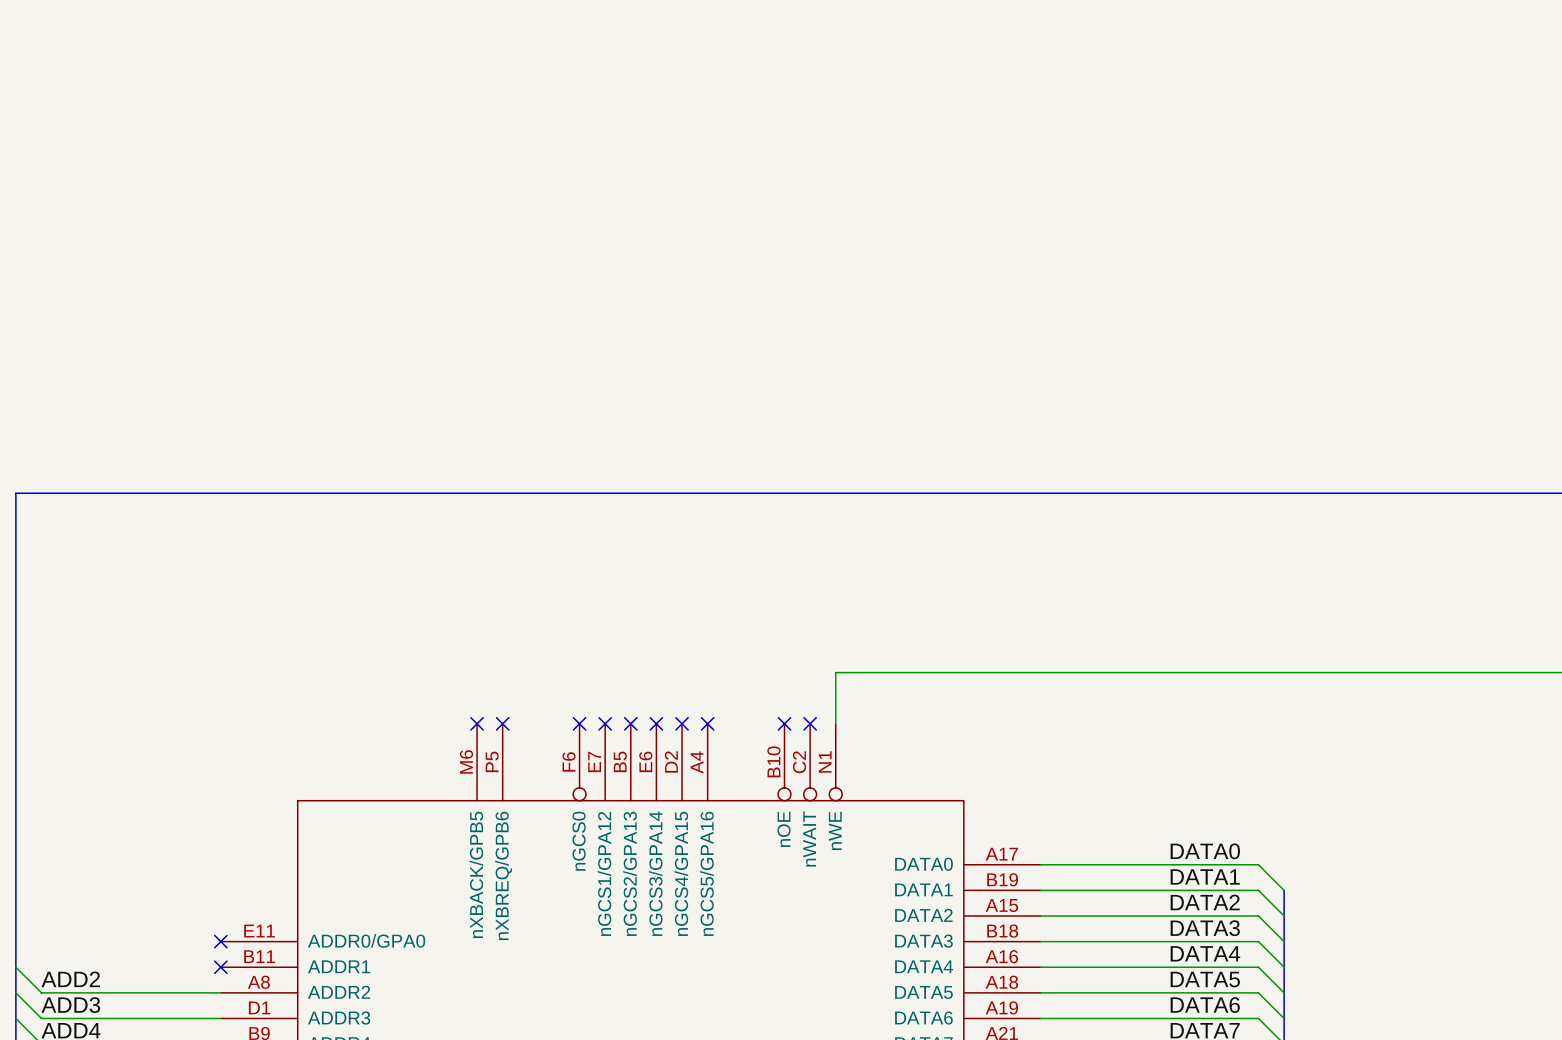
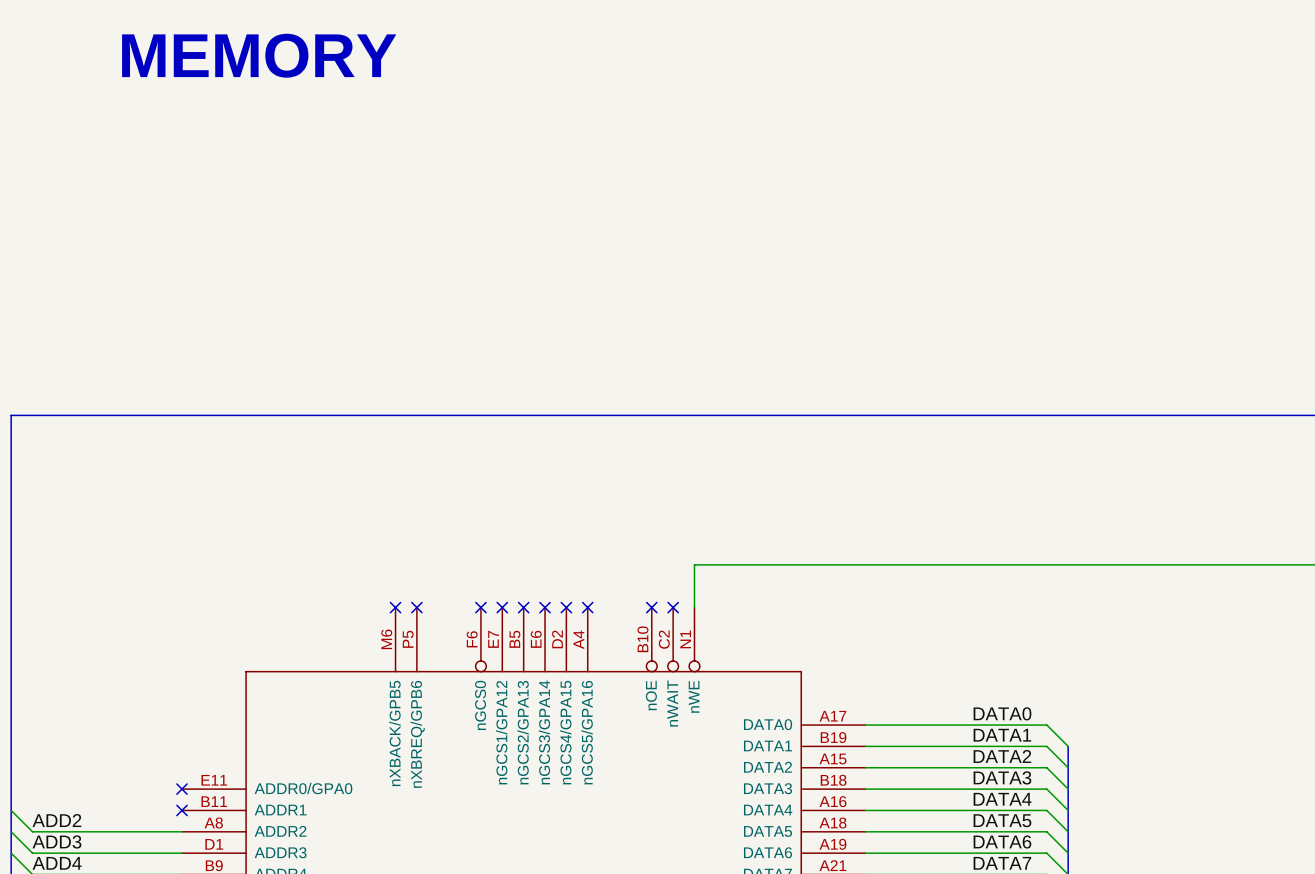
text: none -> MEMORY (259, 55)

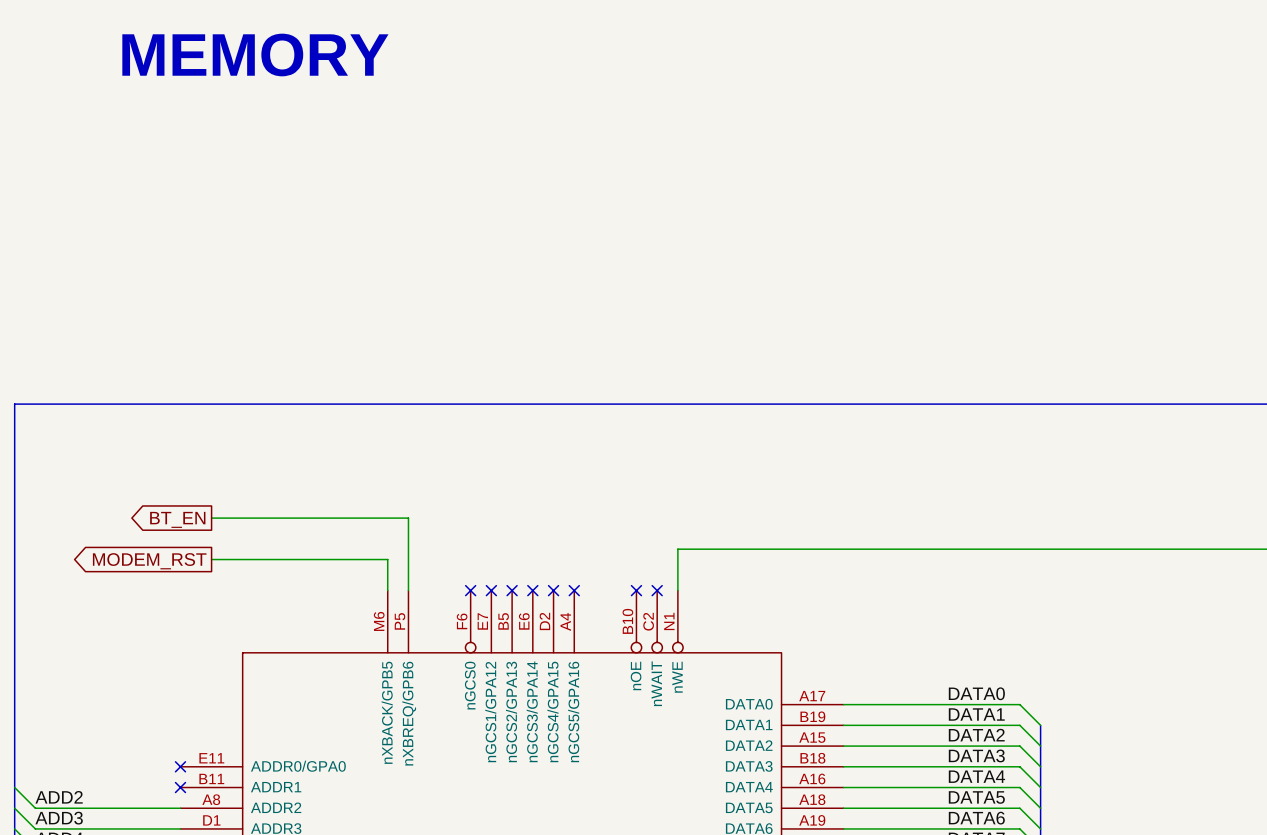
wire: none -> (211, 518) (408, 518) (408, 590)
global label: none -> BT_EN (177, 519)
wire: none -> (211, 559) (387, 559) (387, 590)
global label: none -> MODEM_RST (149, 561)
no-connect mark: (395, 607) -> none
no-connect mark: (416, 607) -> none

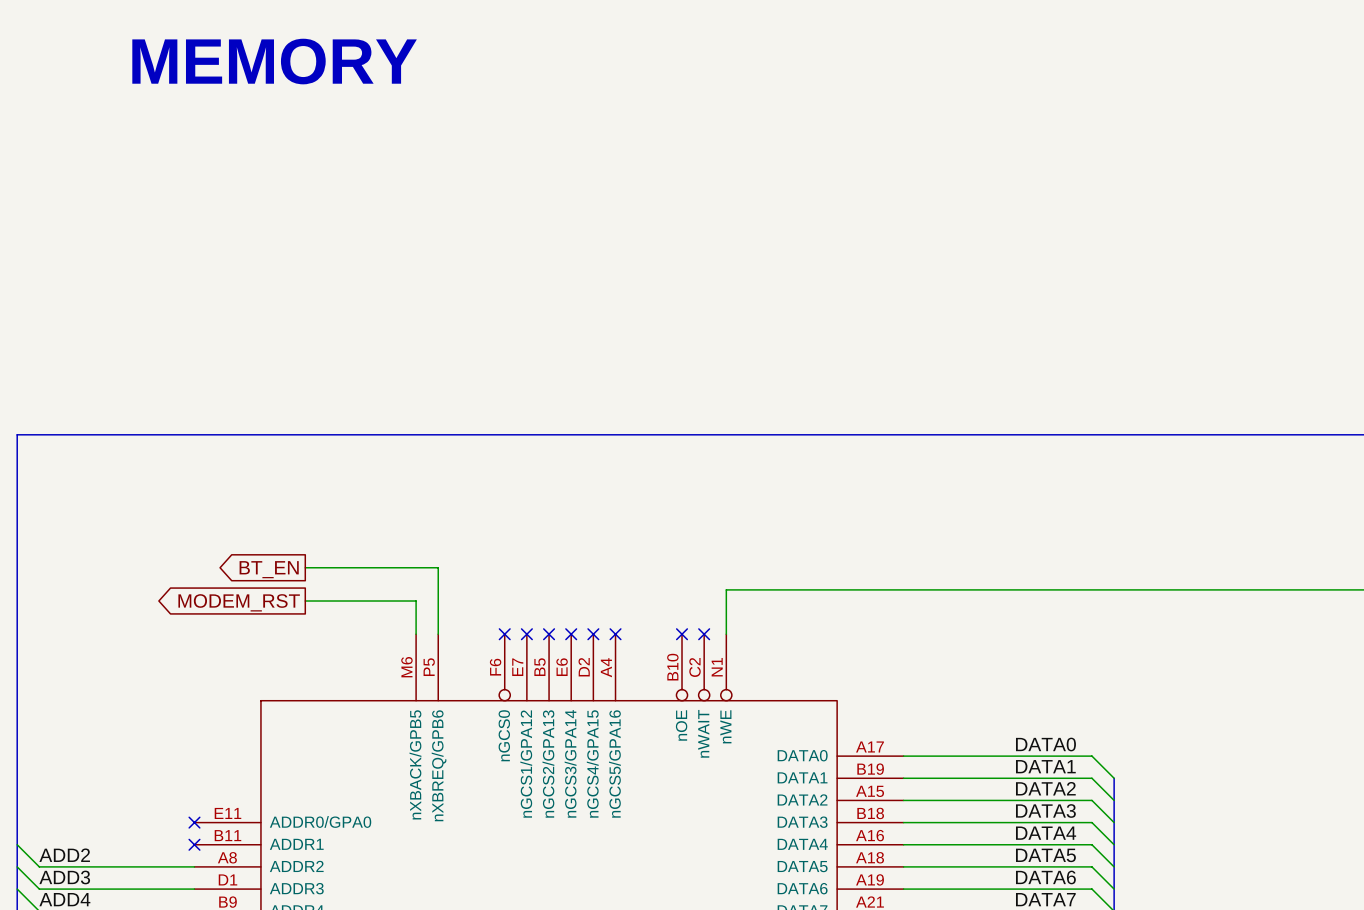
wire: (211, 518) (408, 518) (408, 528) -> (305, 567) (438, 567)
global label position: BT_EN (177, 519) -> BT_EN (269, 569)
wire: (211, 559) (284, 559) -> none
global label position: MODEM_RST (149, 561) -> MODEM_RST (239, 602)

